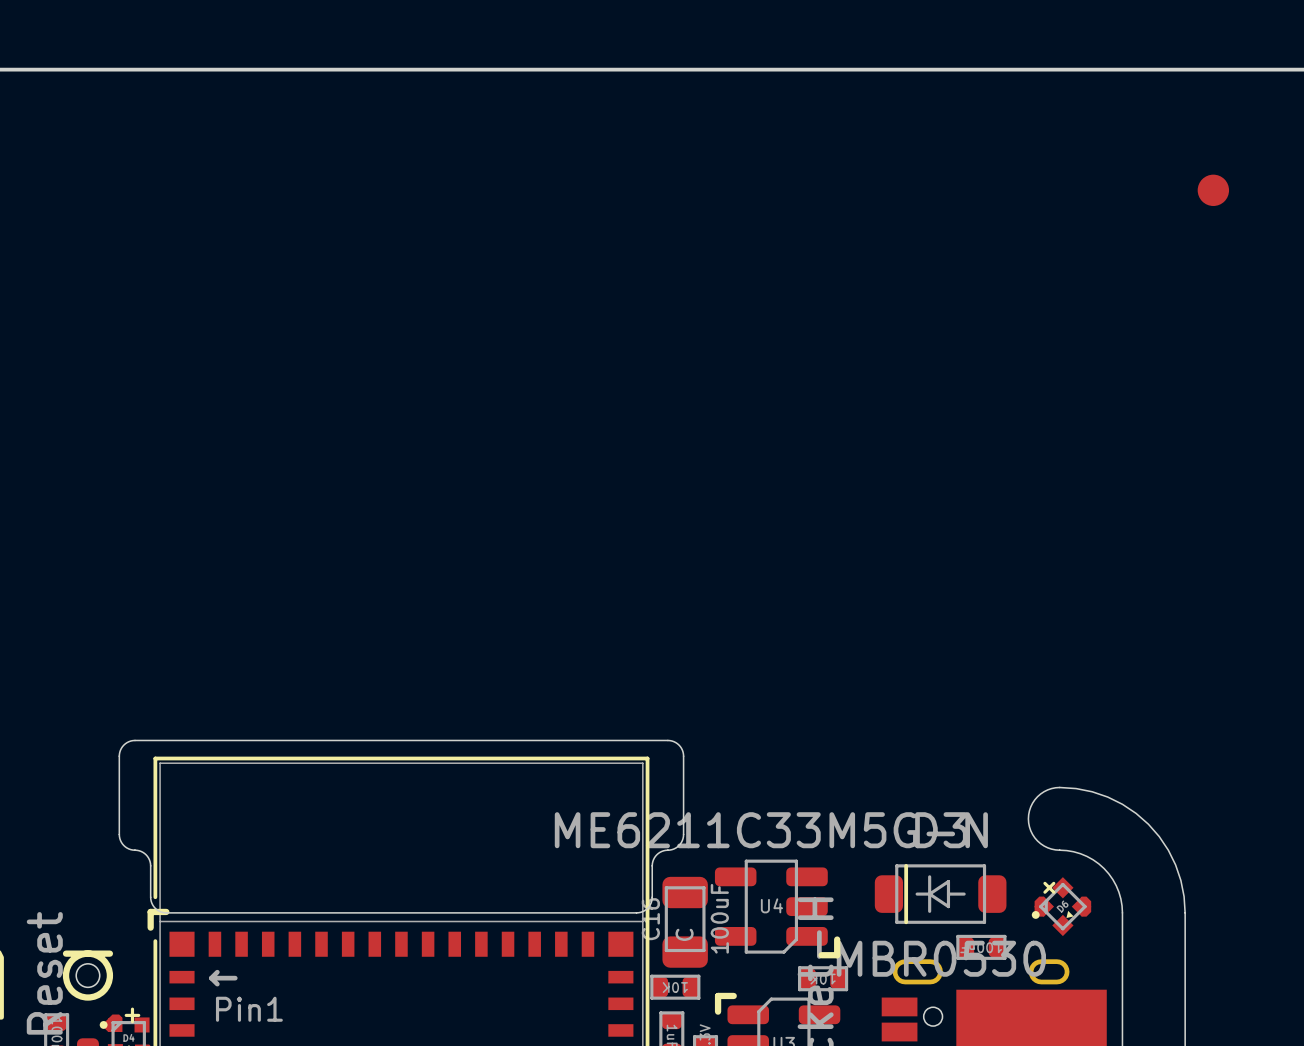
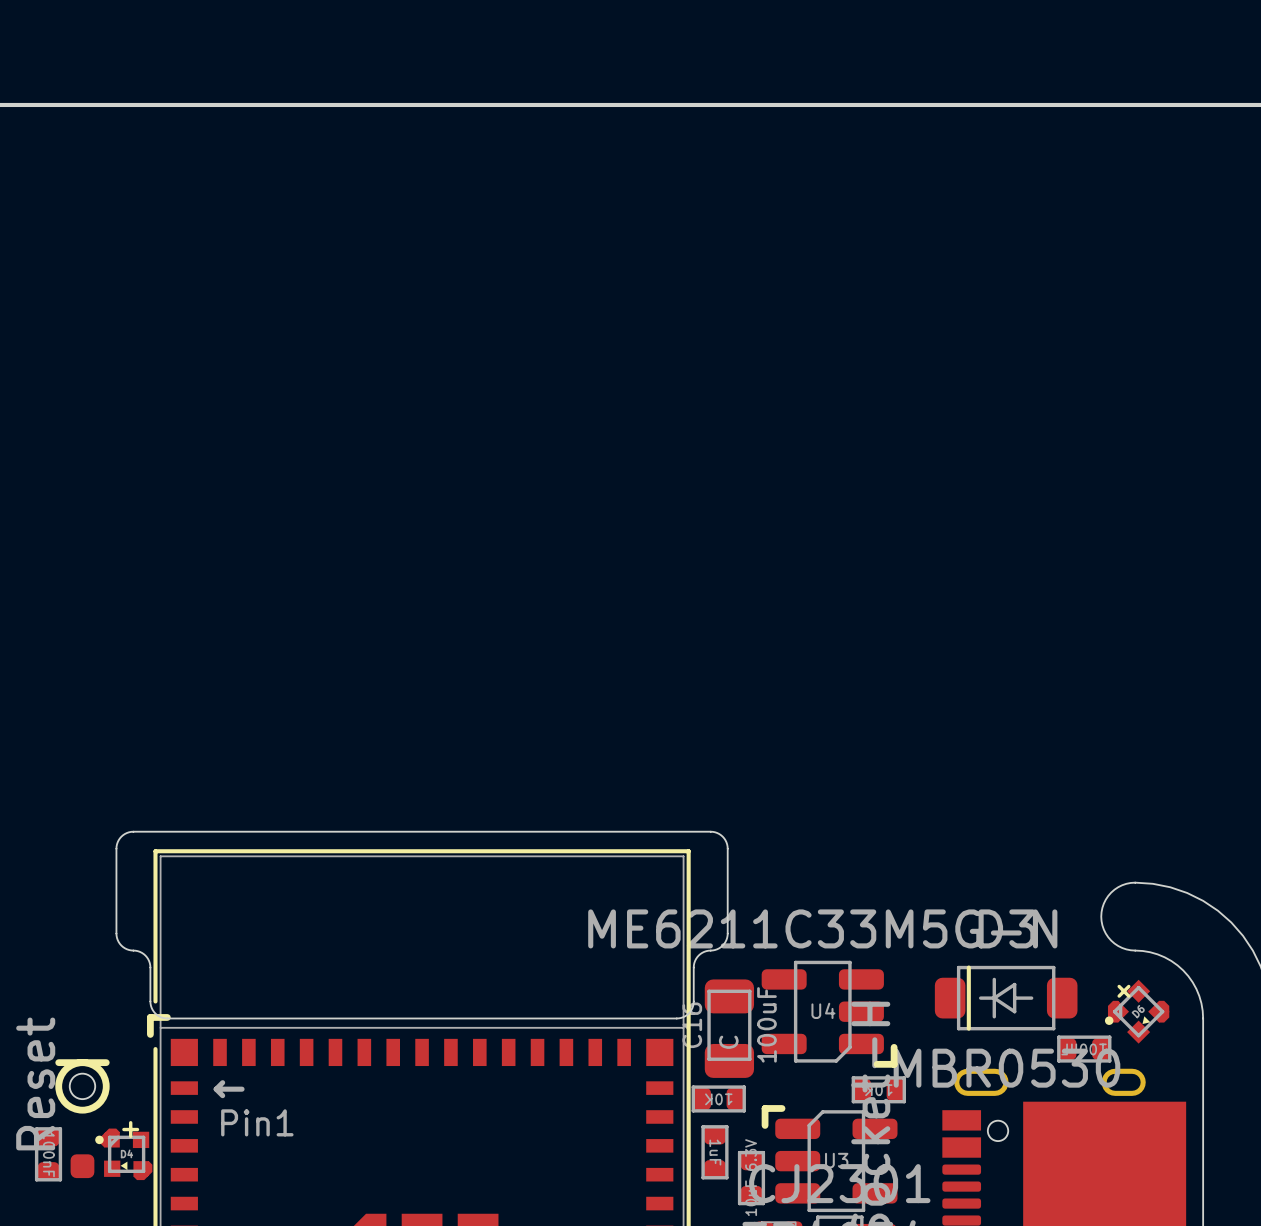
part position: (981, 947) -> (1084, 1049)

